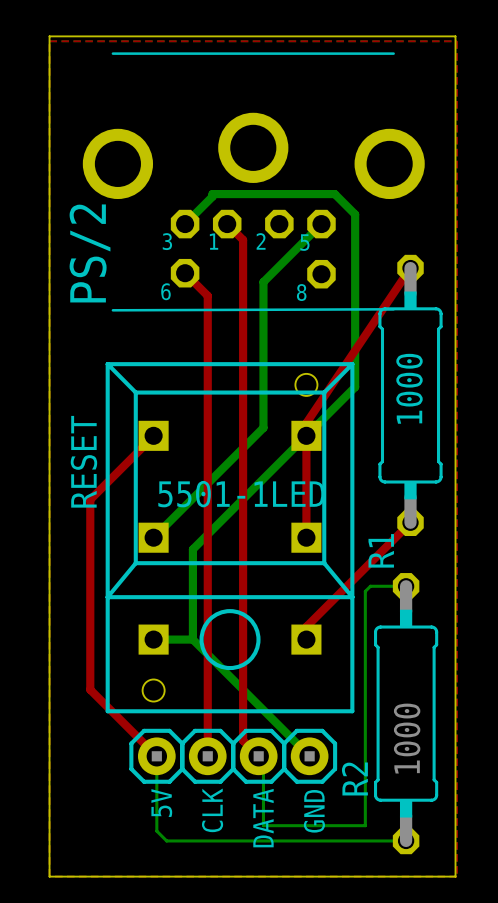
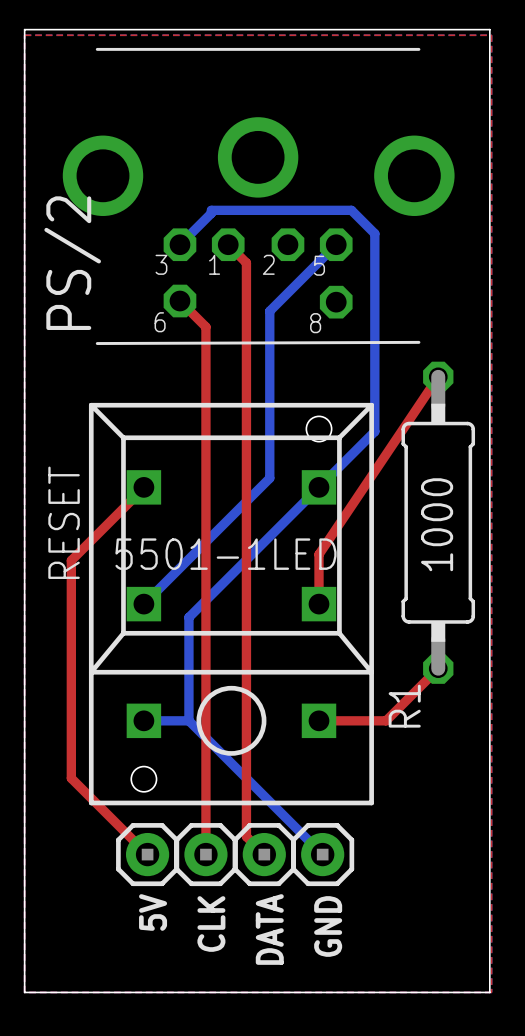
top track: (410, 268) (306, 423) (306, 494) -> (438, 376) (319, 554)
R1 position: (410, 395) -> (438, 522)
top track: (410, 522) (306, 626) (306, 639) -> (438, 668) (386, 720) (319, 720)
bottom track: (406, 586) (370, 586) (365, 591) (365, 825) (263, 825) (263, 761) (258, 756) -> none
R2: 1000 (406, 713) -> none
bottom track: (156, 756) (156, 831) (166, 840) (406, 840) -> none

